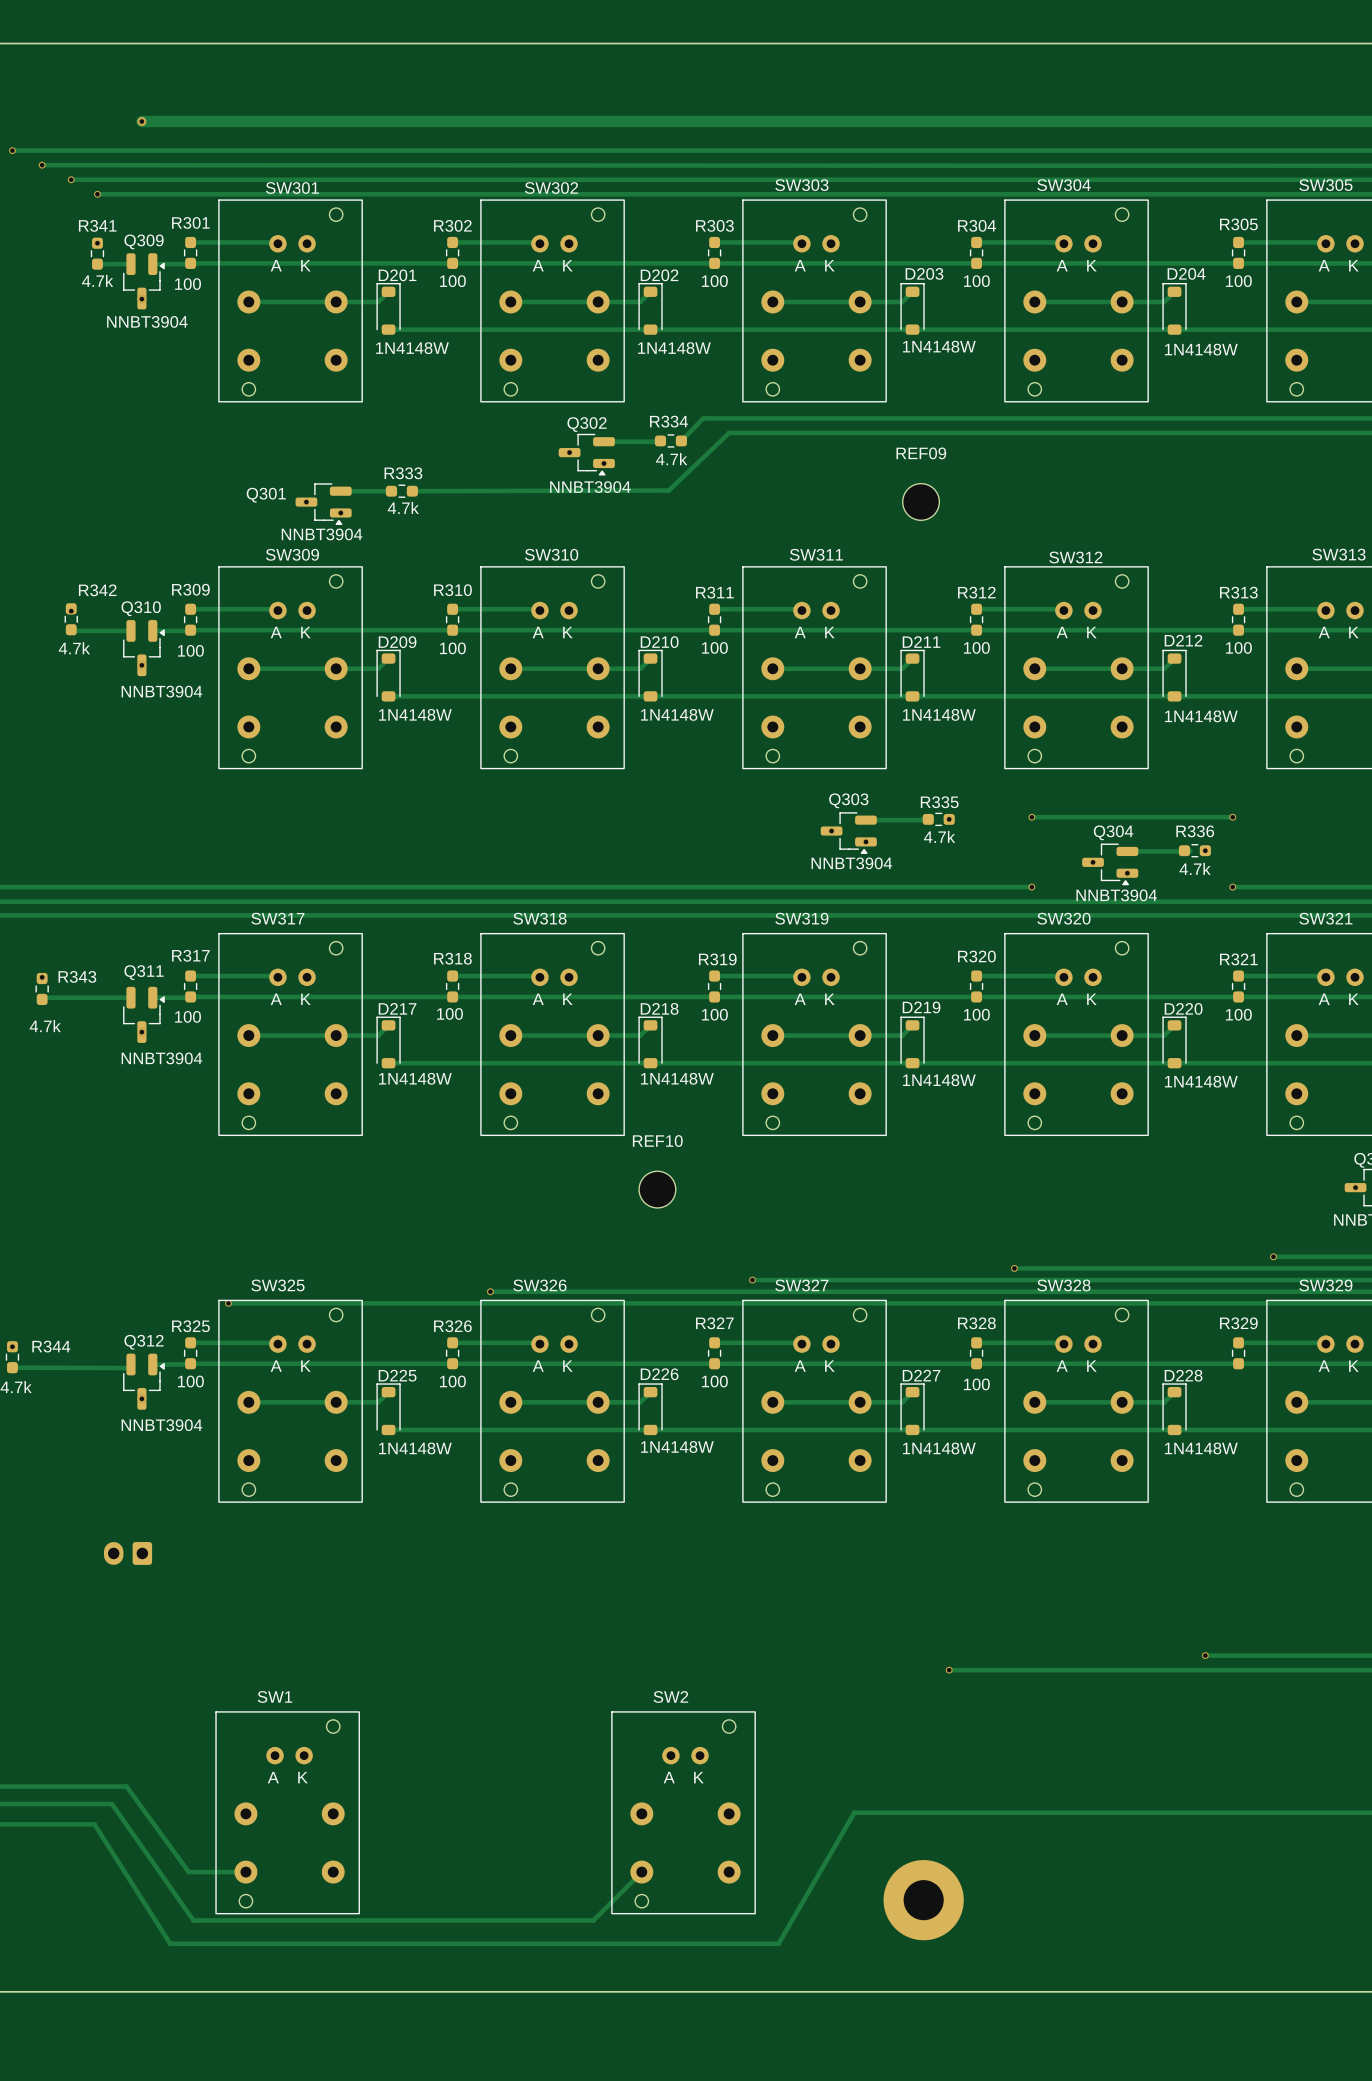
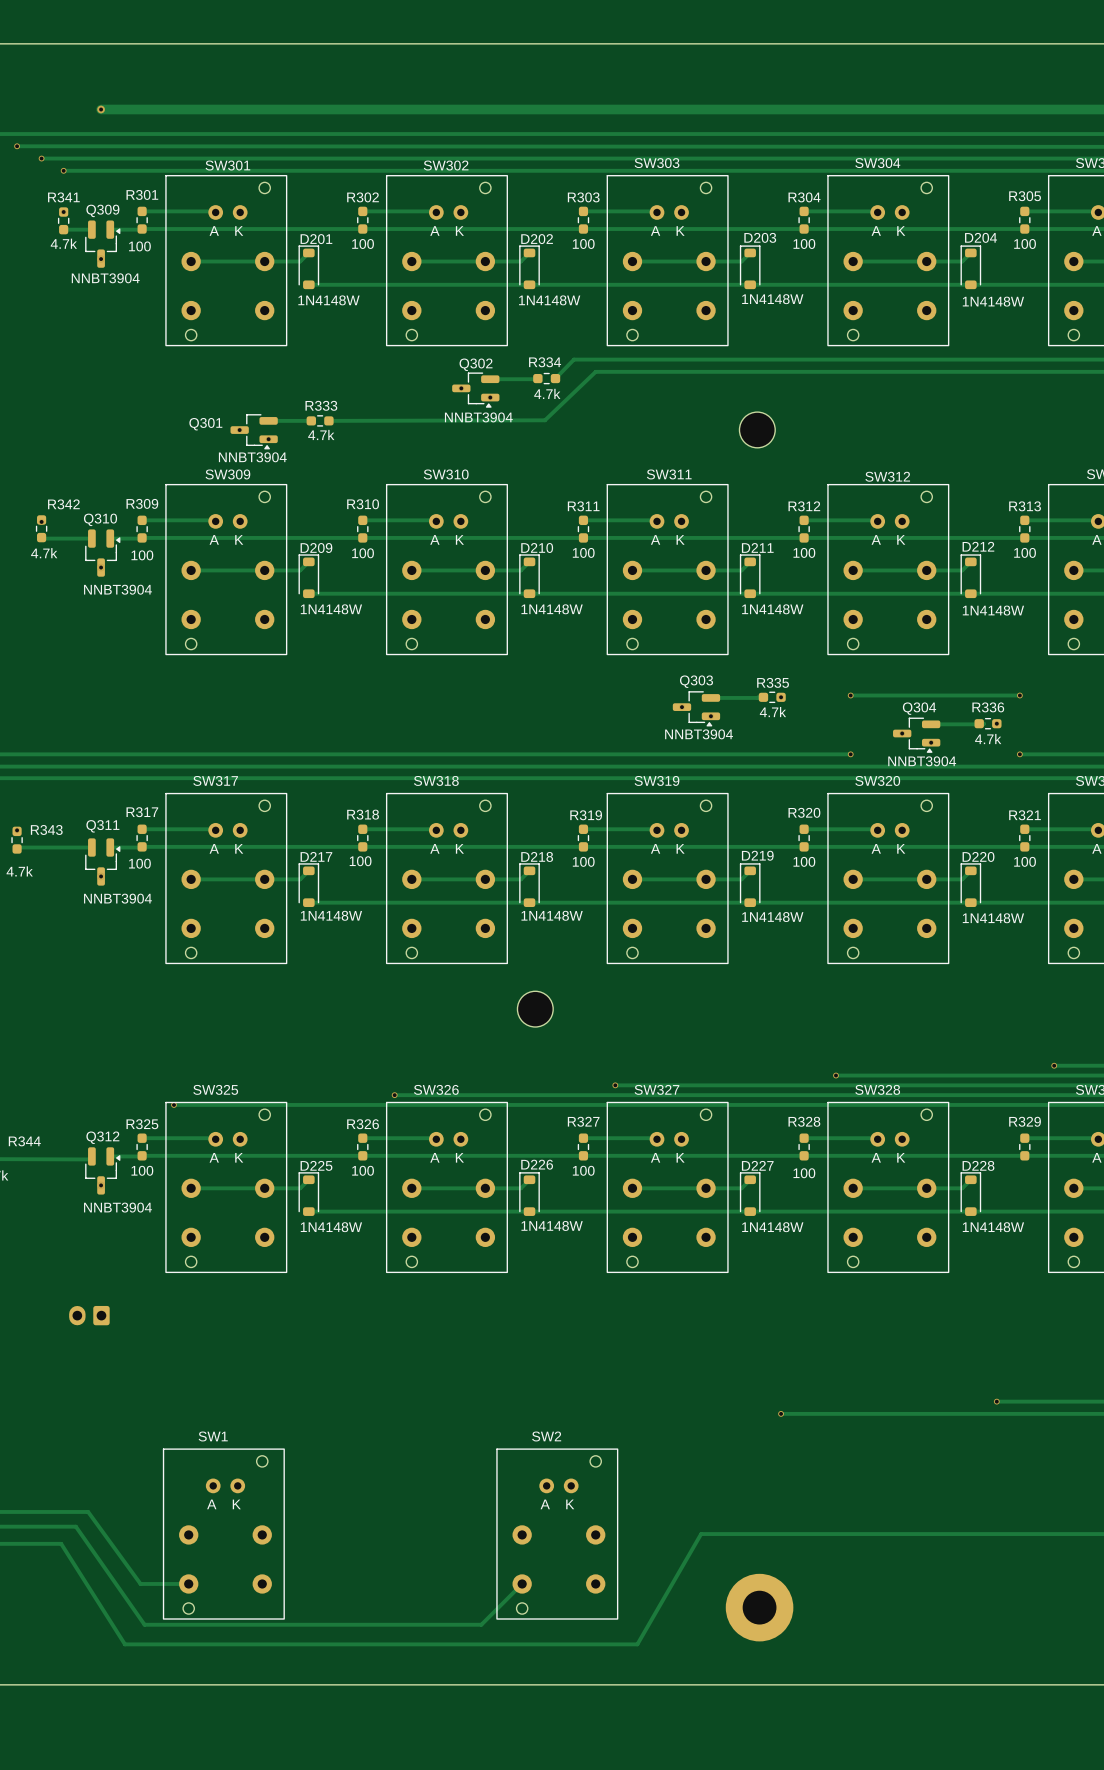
REF09: (921, 501) -> none
part: none -> (757, 429)
REF10: (657, 1189) -> none
part: none -> (535, 1009)

